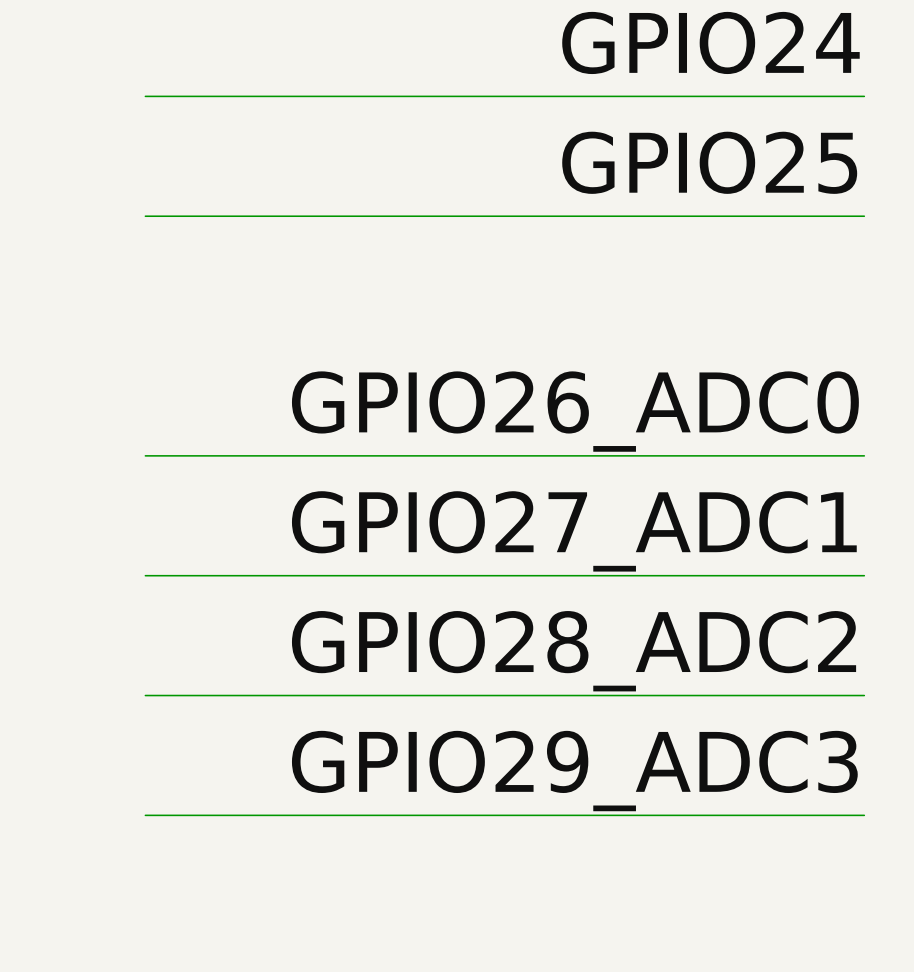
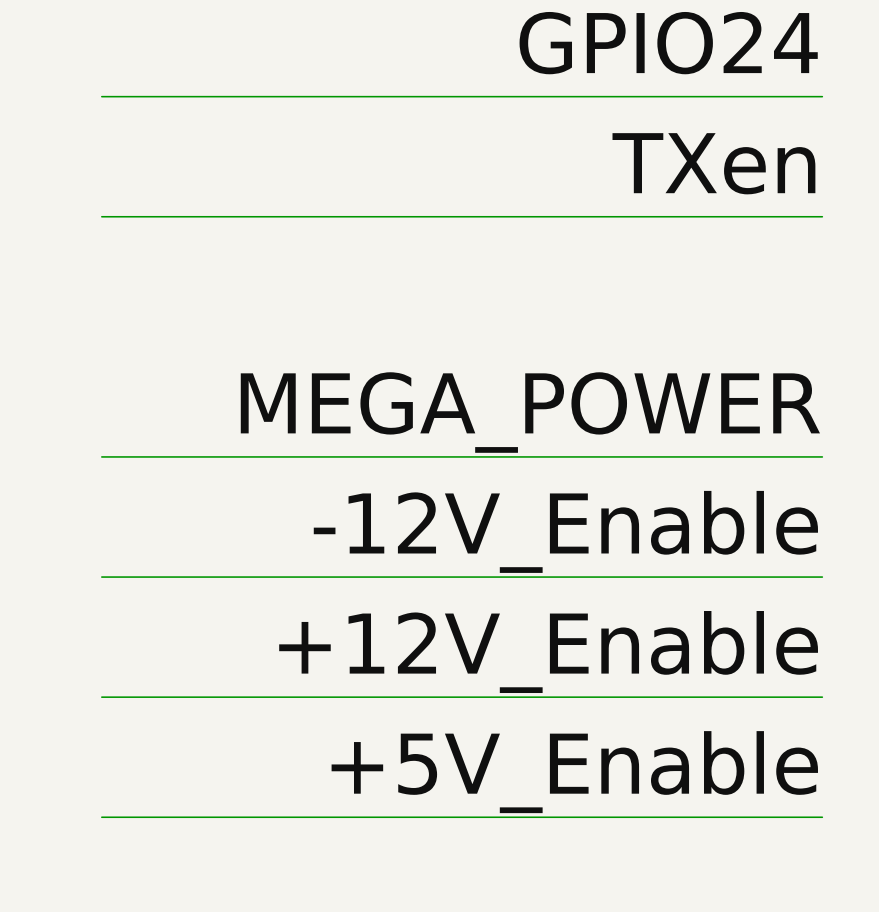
label: GPIO25 (709, 162) -> TXen (713, 163)
label: GPIO26_ADC0 (575, 411) -> MEGA_POWER (530, 412)
label: GPIO27_ADC1 (574, 531) -> -12V_Enable (565, 531)
label: GPIO28_ADC2 (574, 651) -> +12V_Enable (548, 652)
label: GPIO29_ADC3 (574, 771) -> +5V_Enable (574, 772)

